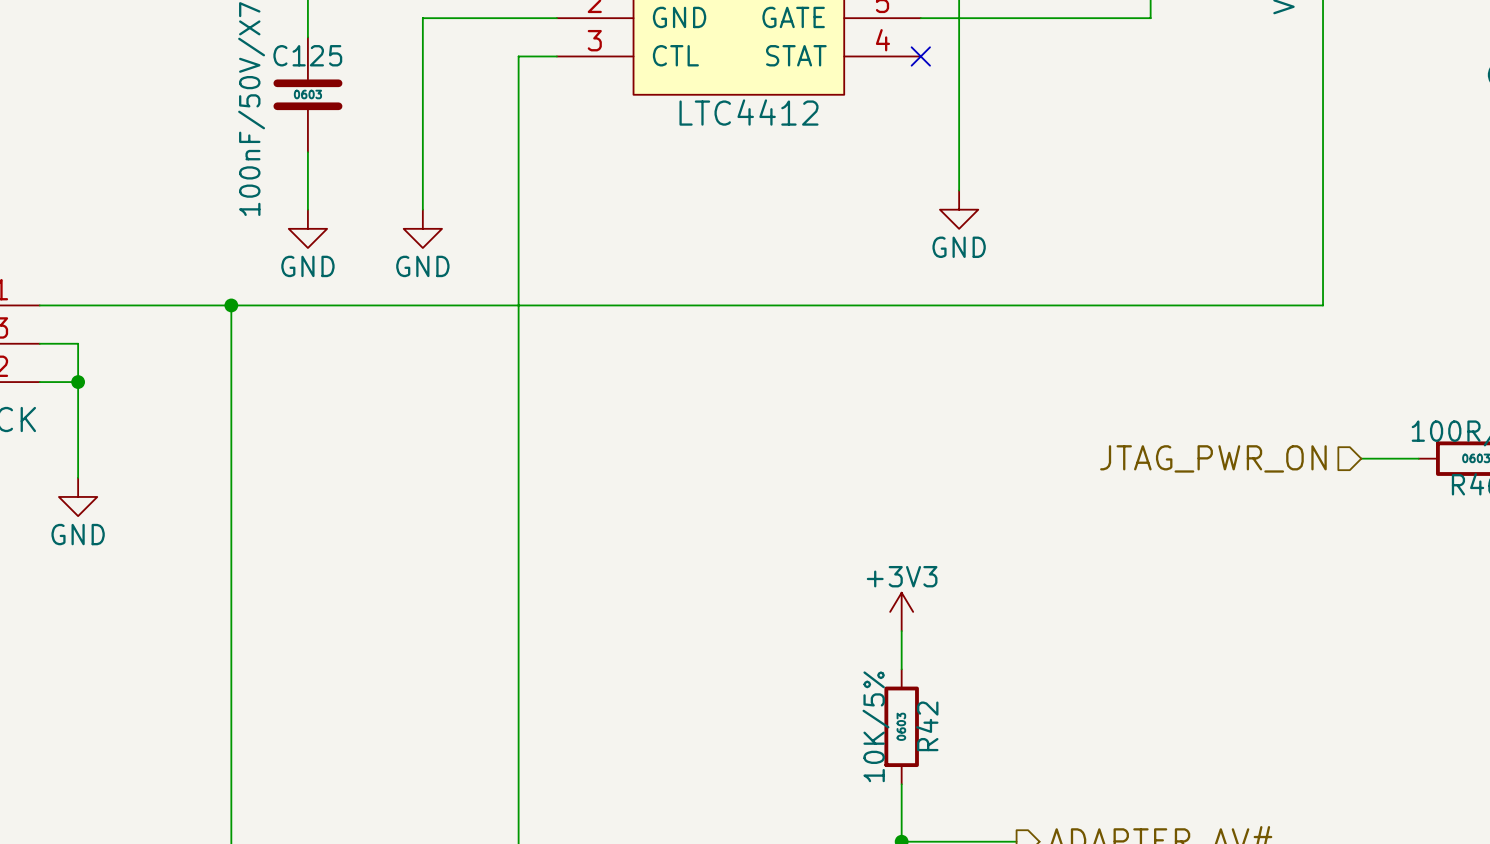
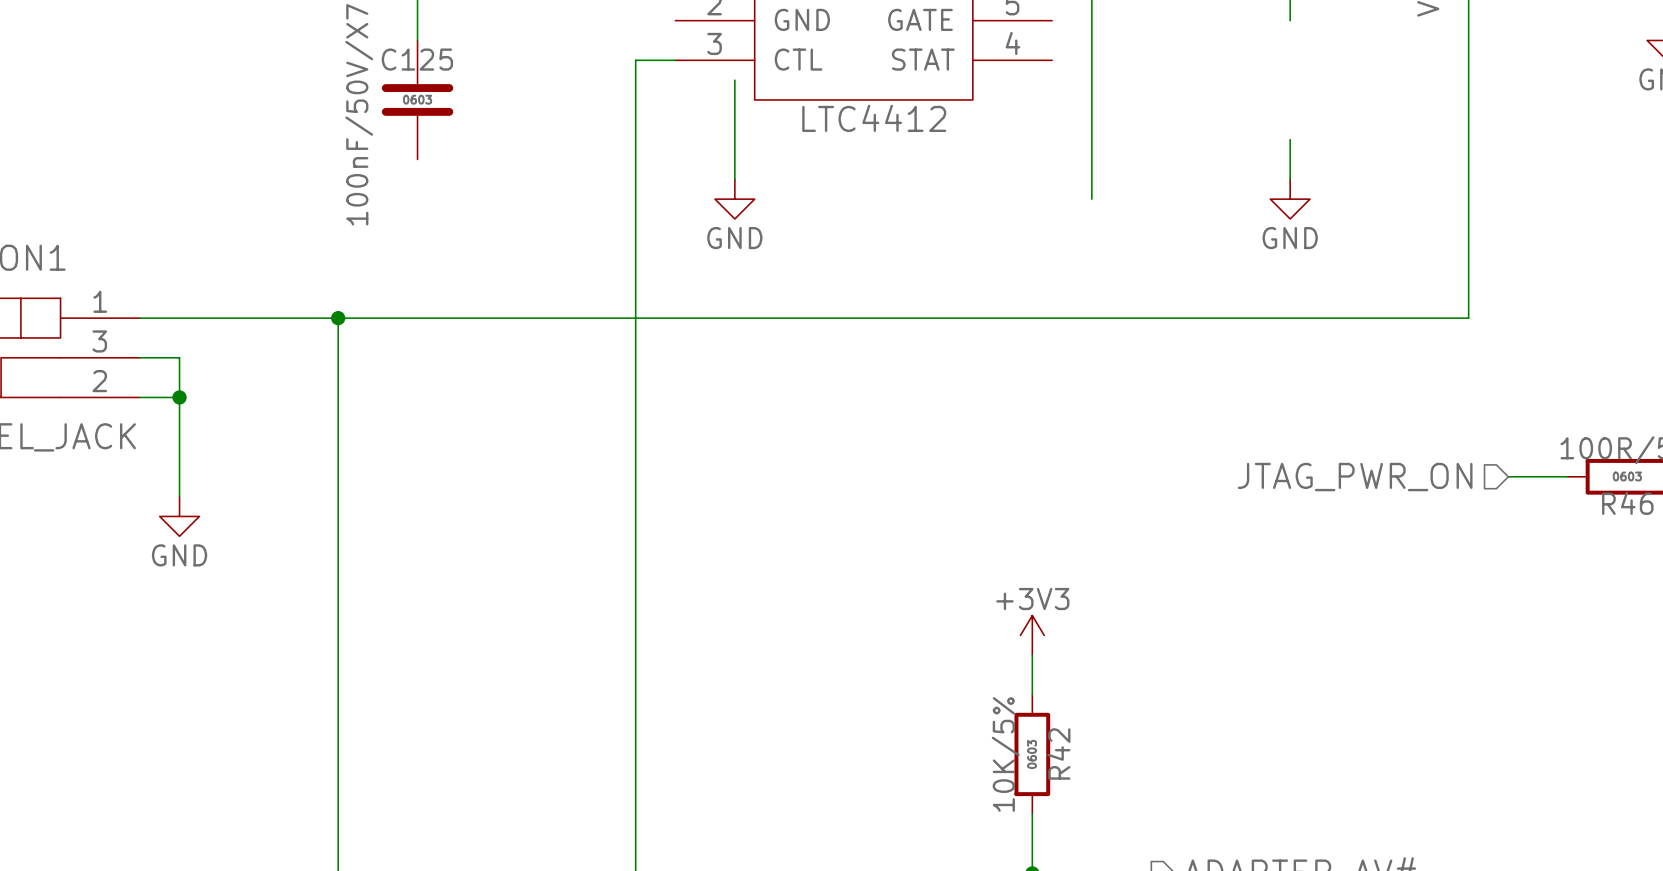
wire: (556, 18) (422, 18) (422, 209) -> none
wire: (920, 18) (1150, 18) -> none
no-connect mark: (920, 56) -> none
wire: none -> (734, 80) (734, 179)
wire: none -> (1290, 139) (1290, 179)
wire: (307, 152) (307, 209) -> none
power symbol: none -> GND (734, 199)
power symbol: none -> GND (1290, 199)
power symbol: GND (959, 209) -> none
power symbol: GND (307, 228) -> none
power symbol: GND (422, 228) -> none

